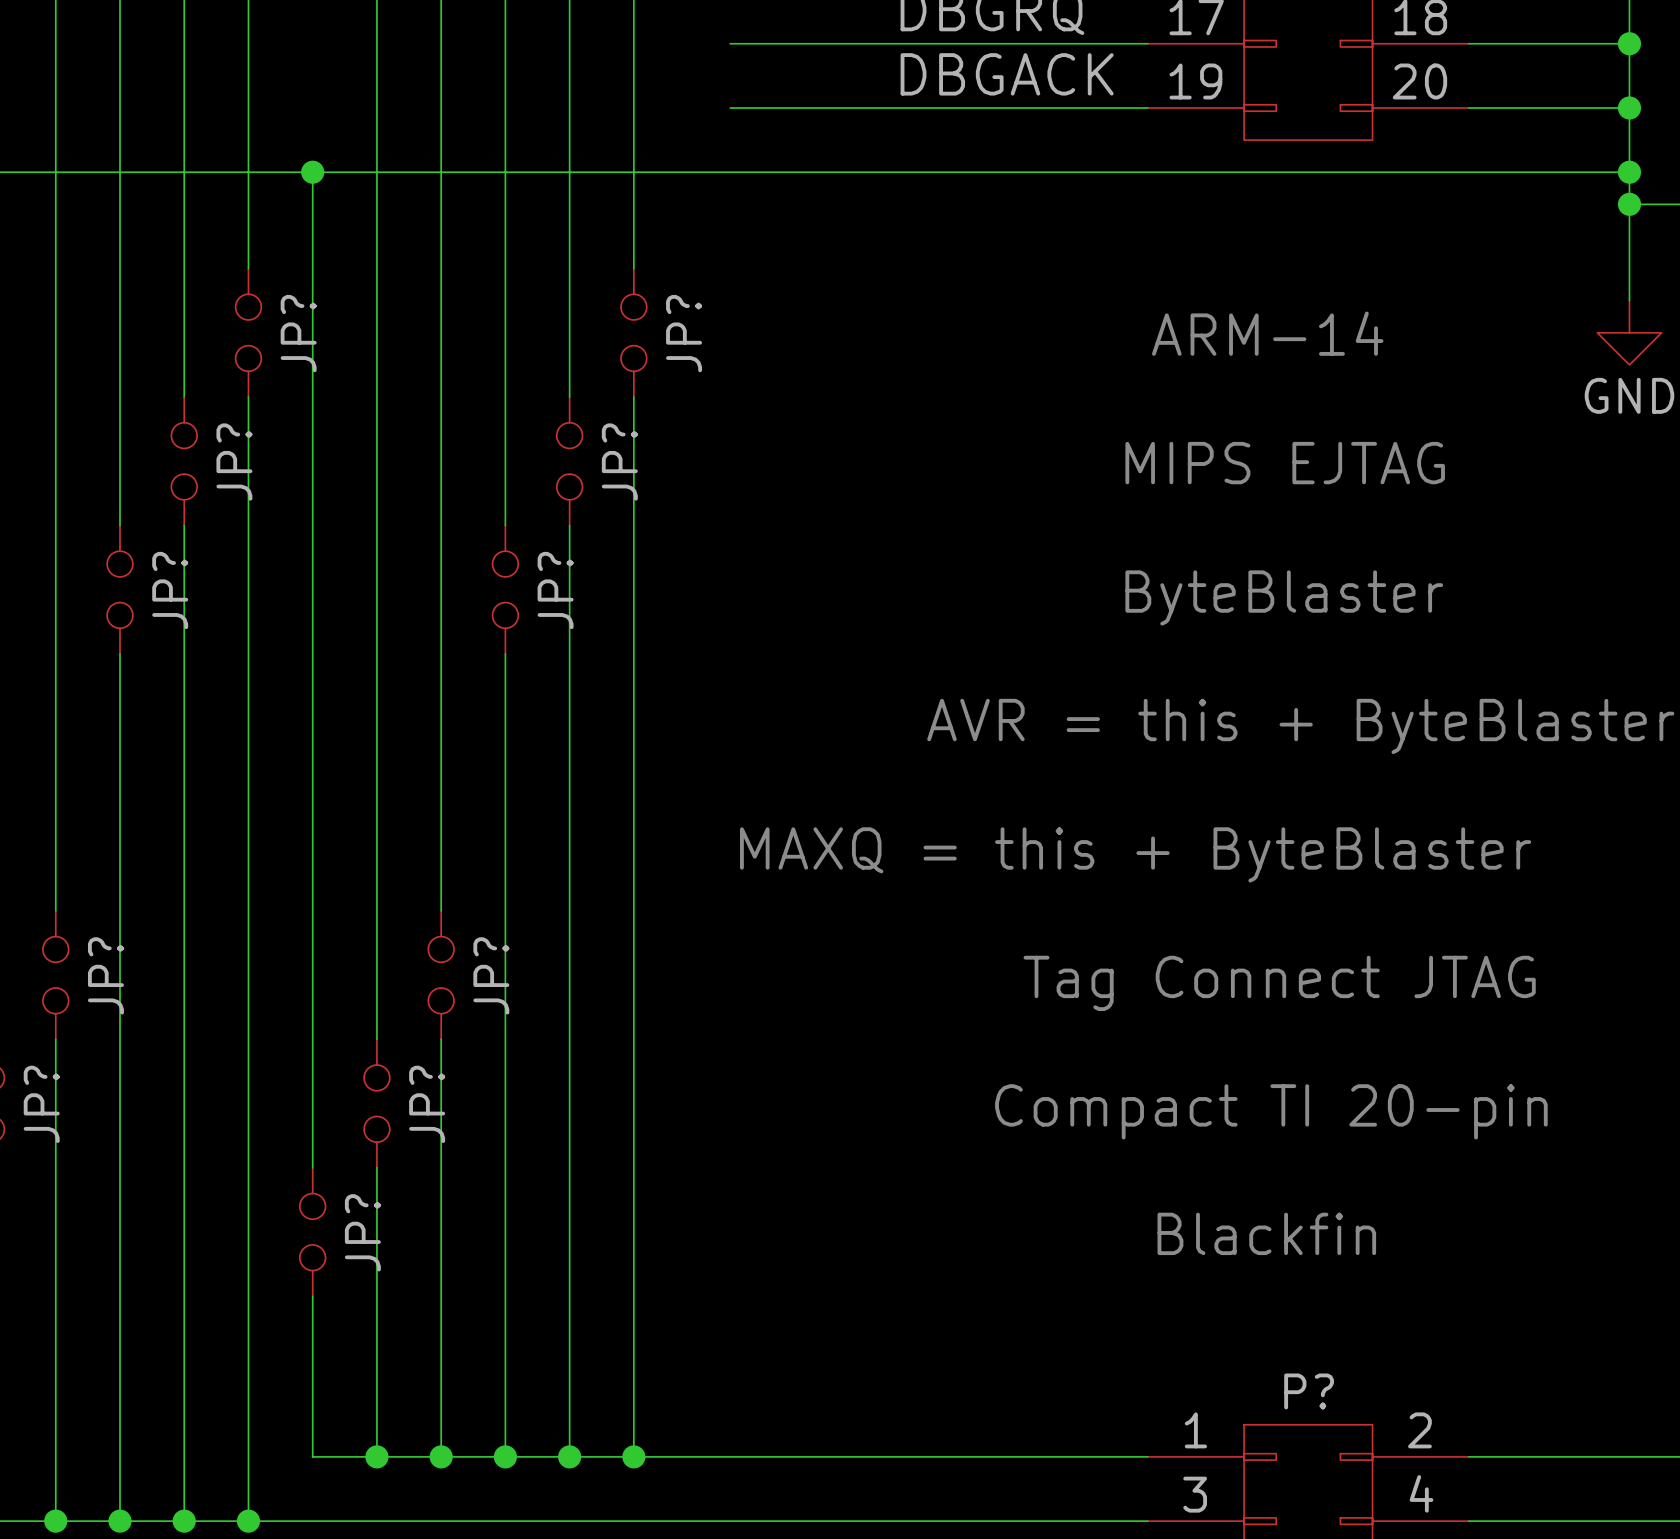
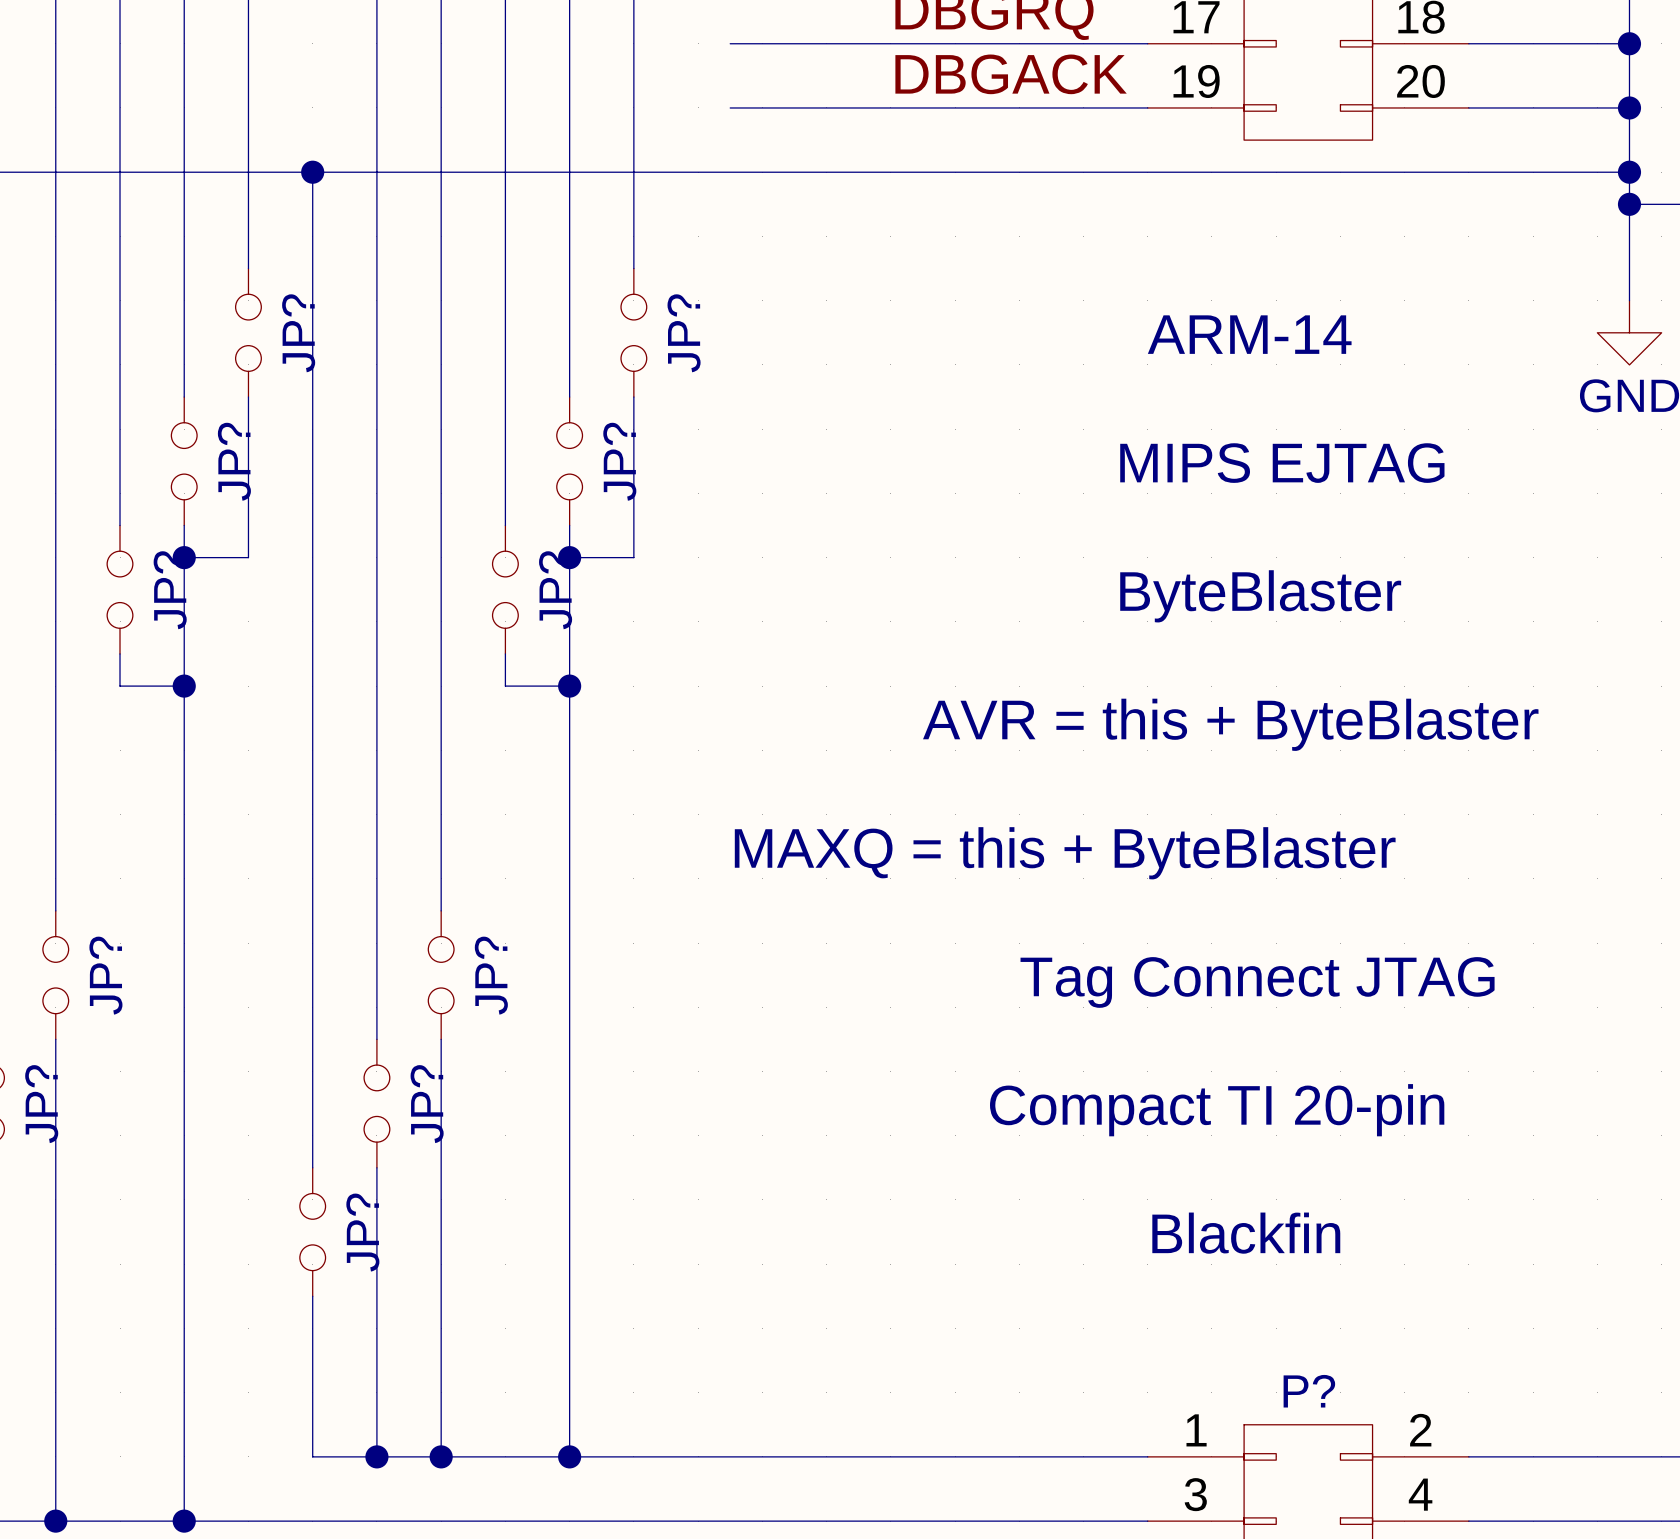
junction: none -> (184, 557)
wire: (248, 557) (248, 1521) -> (248, 557) (184, 557)
junction: none -> (569, 557)
wire: (633, 557) (633, 1456) -> (633, 557) (569, 557)
wire: (120, 686) (120, 1521) -> (120, 686) (184, 686)
junction: none -> (184, 686)
wire: (505, 686) (505, 1456) -> (505, 686) (569, 686)
junction: none -> (569, 686)
junction: (505, 1456) -> none
junction: (633, 1456) -> none
junction: (120, 1521) -> none
junction: (248, 1521) -> none

